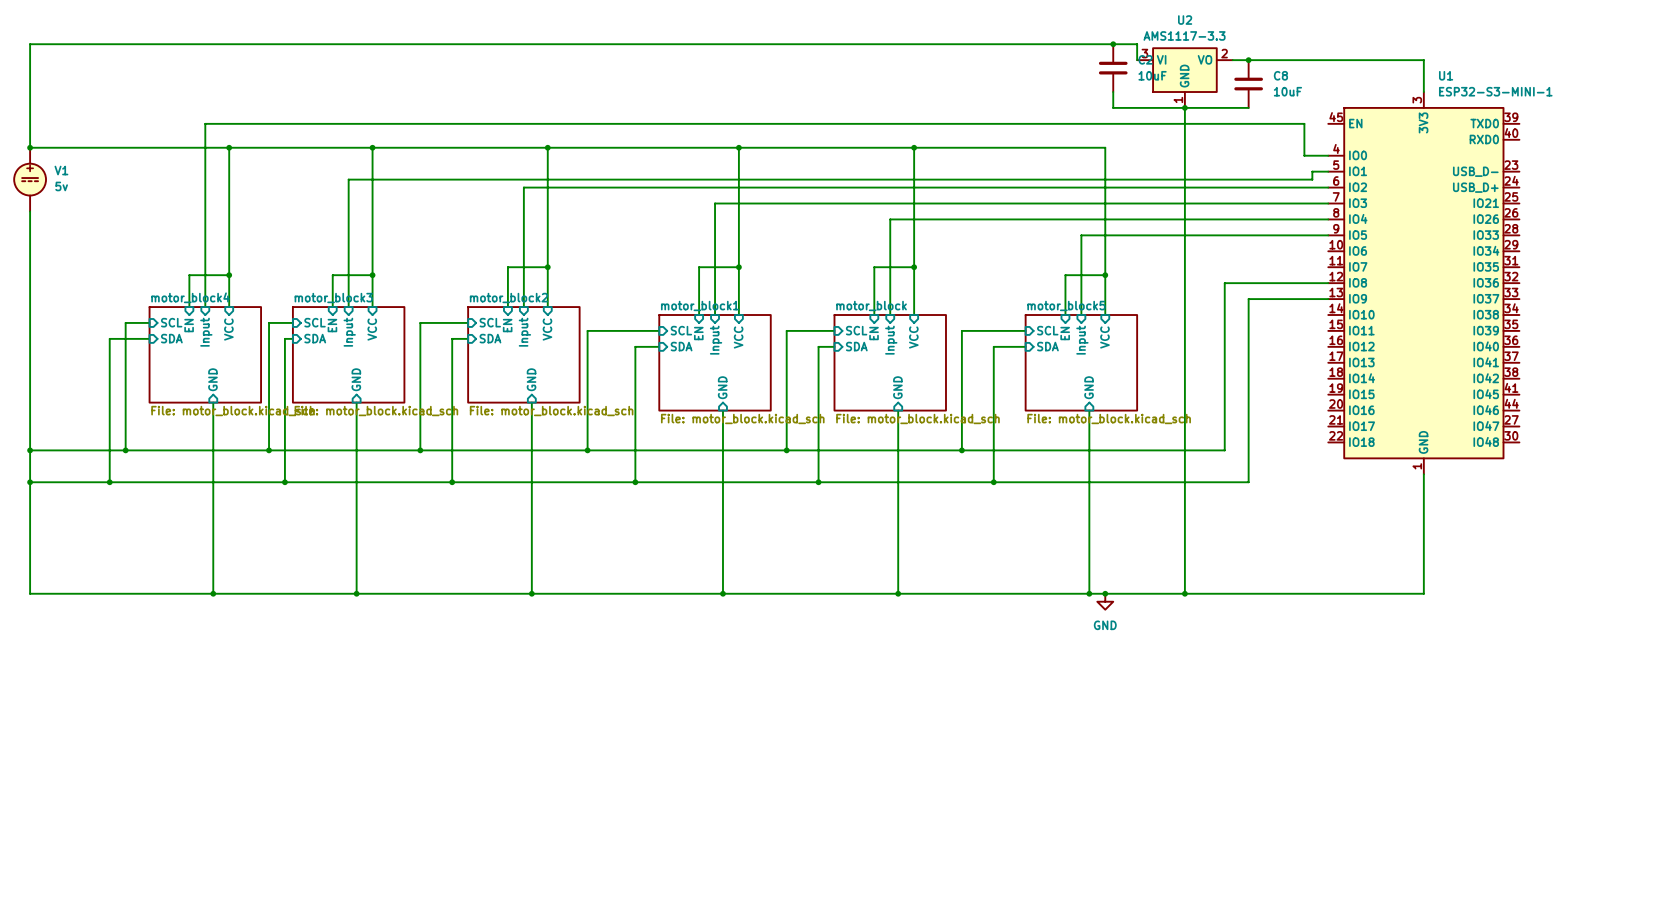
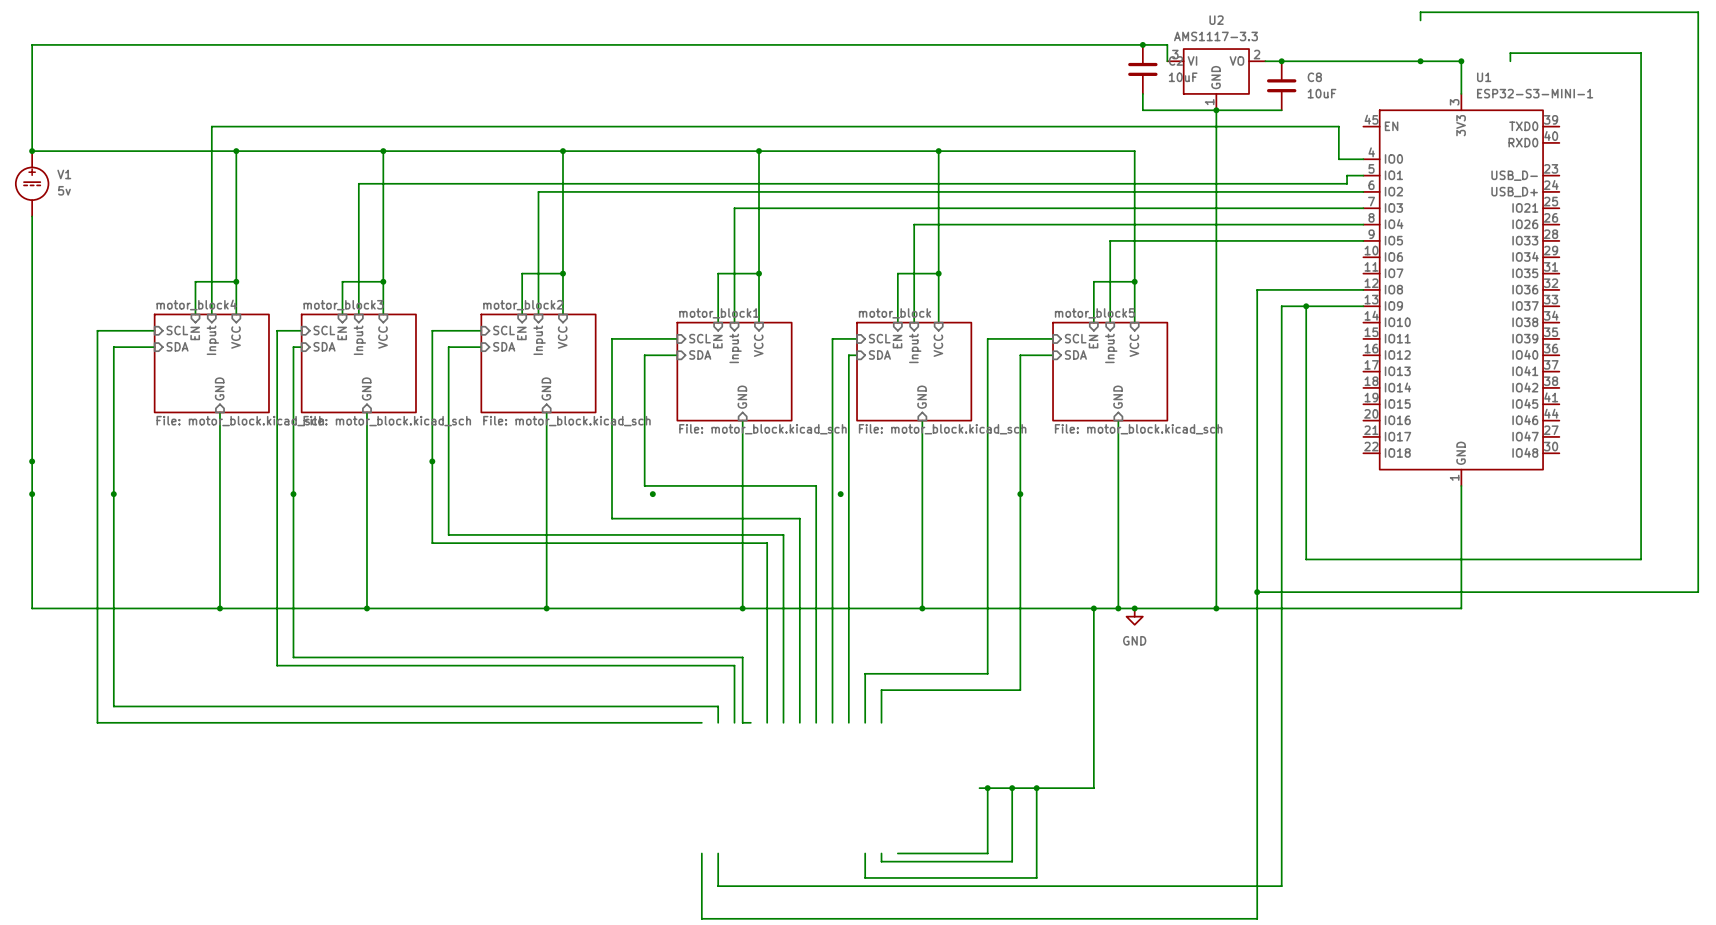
wire: none -> (1420, 20) (1420, 12) (1698, 12) (1698, 592) (1257, 592)
junction: none -> (1420, 61)
junction: none -> (1461, 61)
wire: none -> (1510, 61) (1510, 53) (1641, 53) (1641, 559) (1306, 559) (1306, 306)
junction: none -> (1306, 306)
wire: (125, 322) (125, 450) -> (130, 330) (97, 330) (97, 722) (701, 722)
wire: (595, 330) (587, 330) (587, 450) -> (612, 338) (612, 518) (799, 518) (799, 722)
wire: (810, 330) (786, 330) (786, 450) -> (832, 338) (832, 722)
wire: (452, 338) (452, 482) -> (464, 347) (448, 347) (448, 534) (783, 534) (783, 722)
wire: (635, 346) (635, 482) -> (652, 355) (644, 355) (644, 485) (816, 485) (816, 722)
wire: (826, 346) (818, 346) (818, 482) -> (848, 355) (848, 722)
wire: (30, 450) (1224, 450) -> (701, 853) (701, 918) (1257, 918) (1257, 461)
junction: (125, 450) -> none
wire: none -> (277, 461) (277, 665) (734, 665) (734, 722)
junction: (269, 450) -> none
wire: none -> (432, 461) (432, 543) (767, 543) (767, 722)
junction: (587, 450) -> none
junction: (786, 450) -> none
wire: none -> (987, 461) (987, 673) (865, 673) (865, 722)
junction: (961, 450) -> none
wire: (30, 482) (1248, 482) -> (718, 853) (718, 886) (1281, 886) (1281, 494)
wire: none -> (113, 494) (113, 706) (718, 706) (718, 722)
wire: none -> (293, 494) (293, 657) (742, 657) (742, 722) (750, 722)
junction: (452, 482) -> none
wire: none -> (1020, 494) (1020, 690) (881, 690) (881, 722)
junction: none -> (1257, 592)
wire: none -> (1093, 608) (1093, 788) (979, 788)
junction: none -> (1093, 608)
wire: none -> (987, 788) (987, 853) (897, 853)
junction: none -> (987, 788)
wire: none -> (1012, 788) (1012, 861) (881, 861) (881, 853)
junction: none -> (1012, 788)
wire: none -> (1036, 788) (1036, 877) (865, 877) (865, 853)
junction: none -> (1036, 788)

